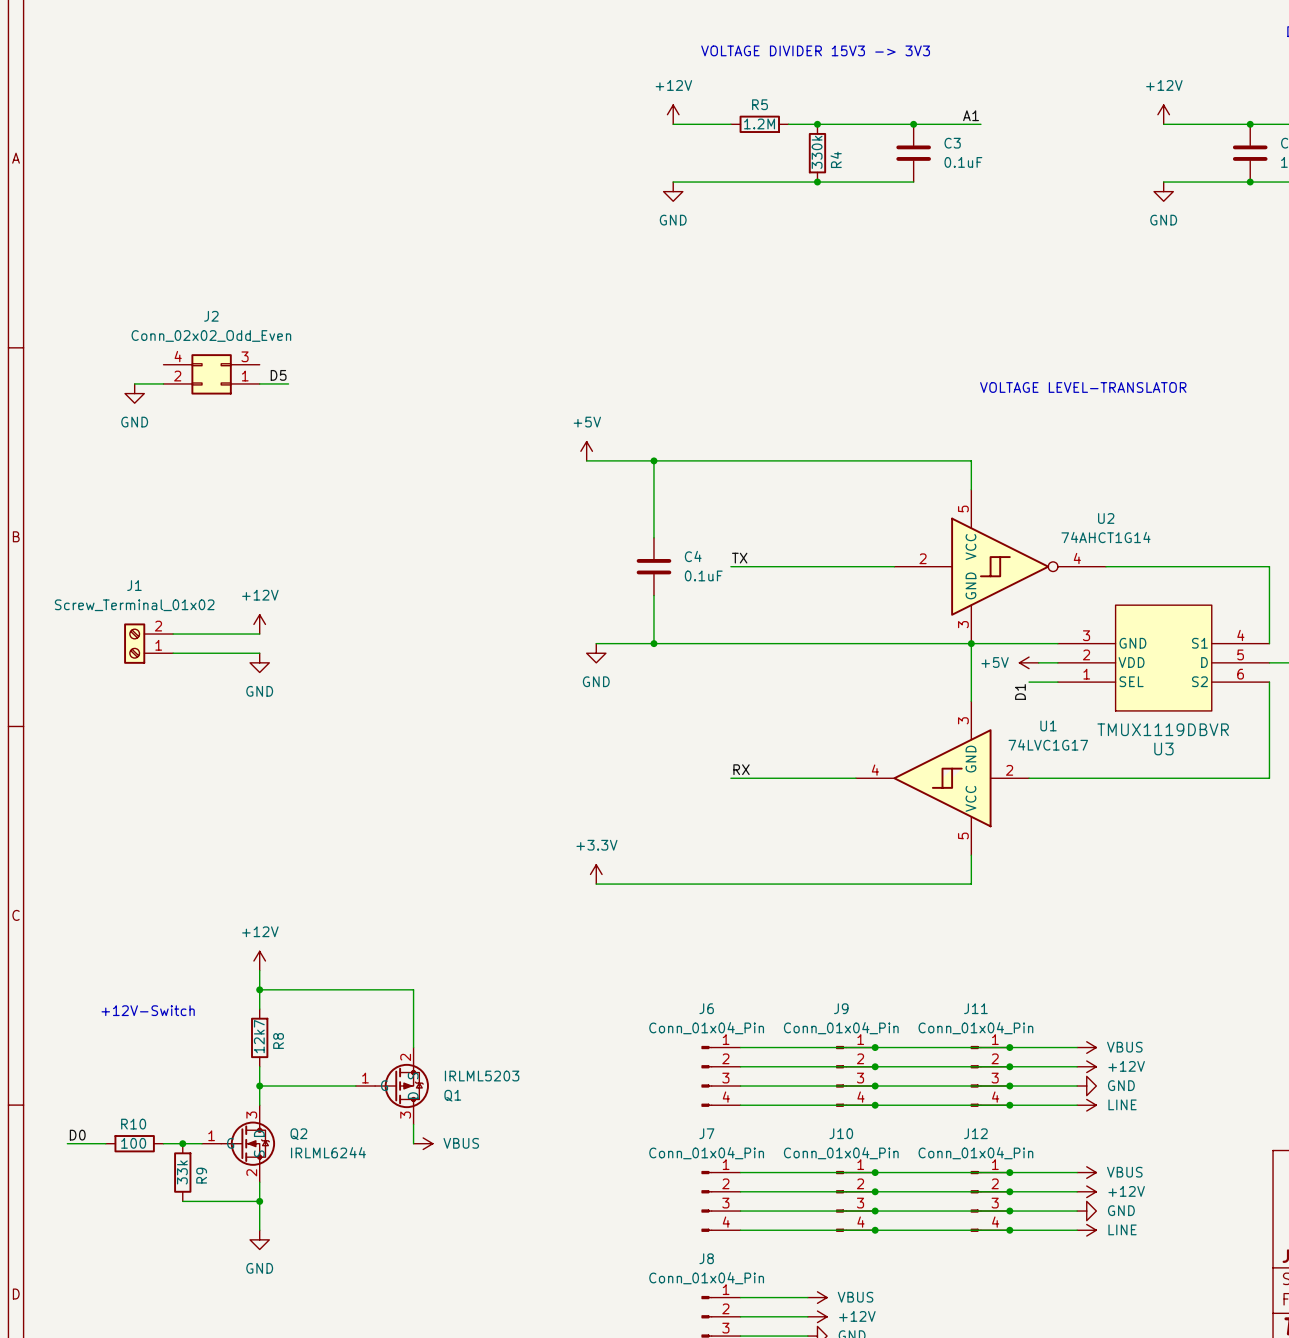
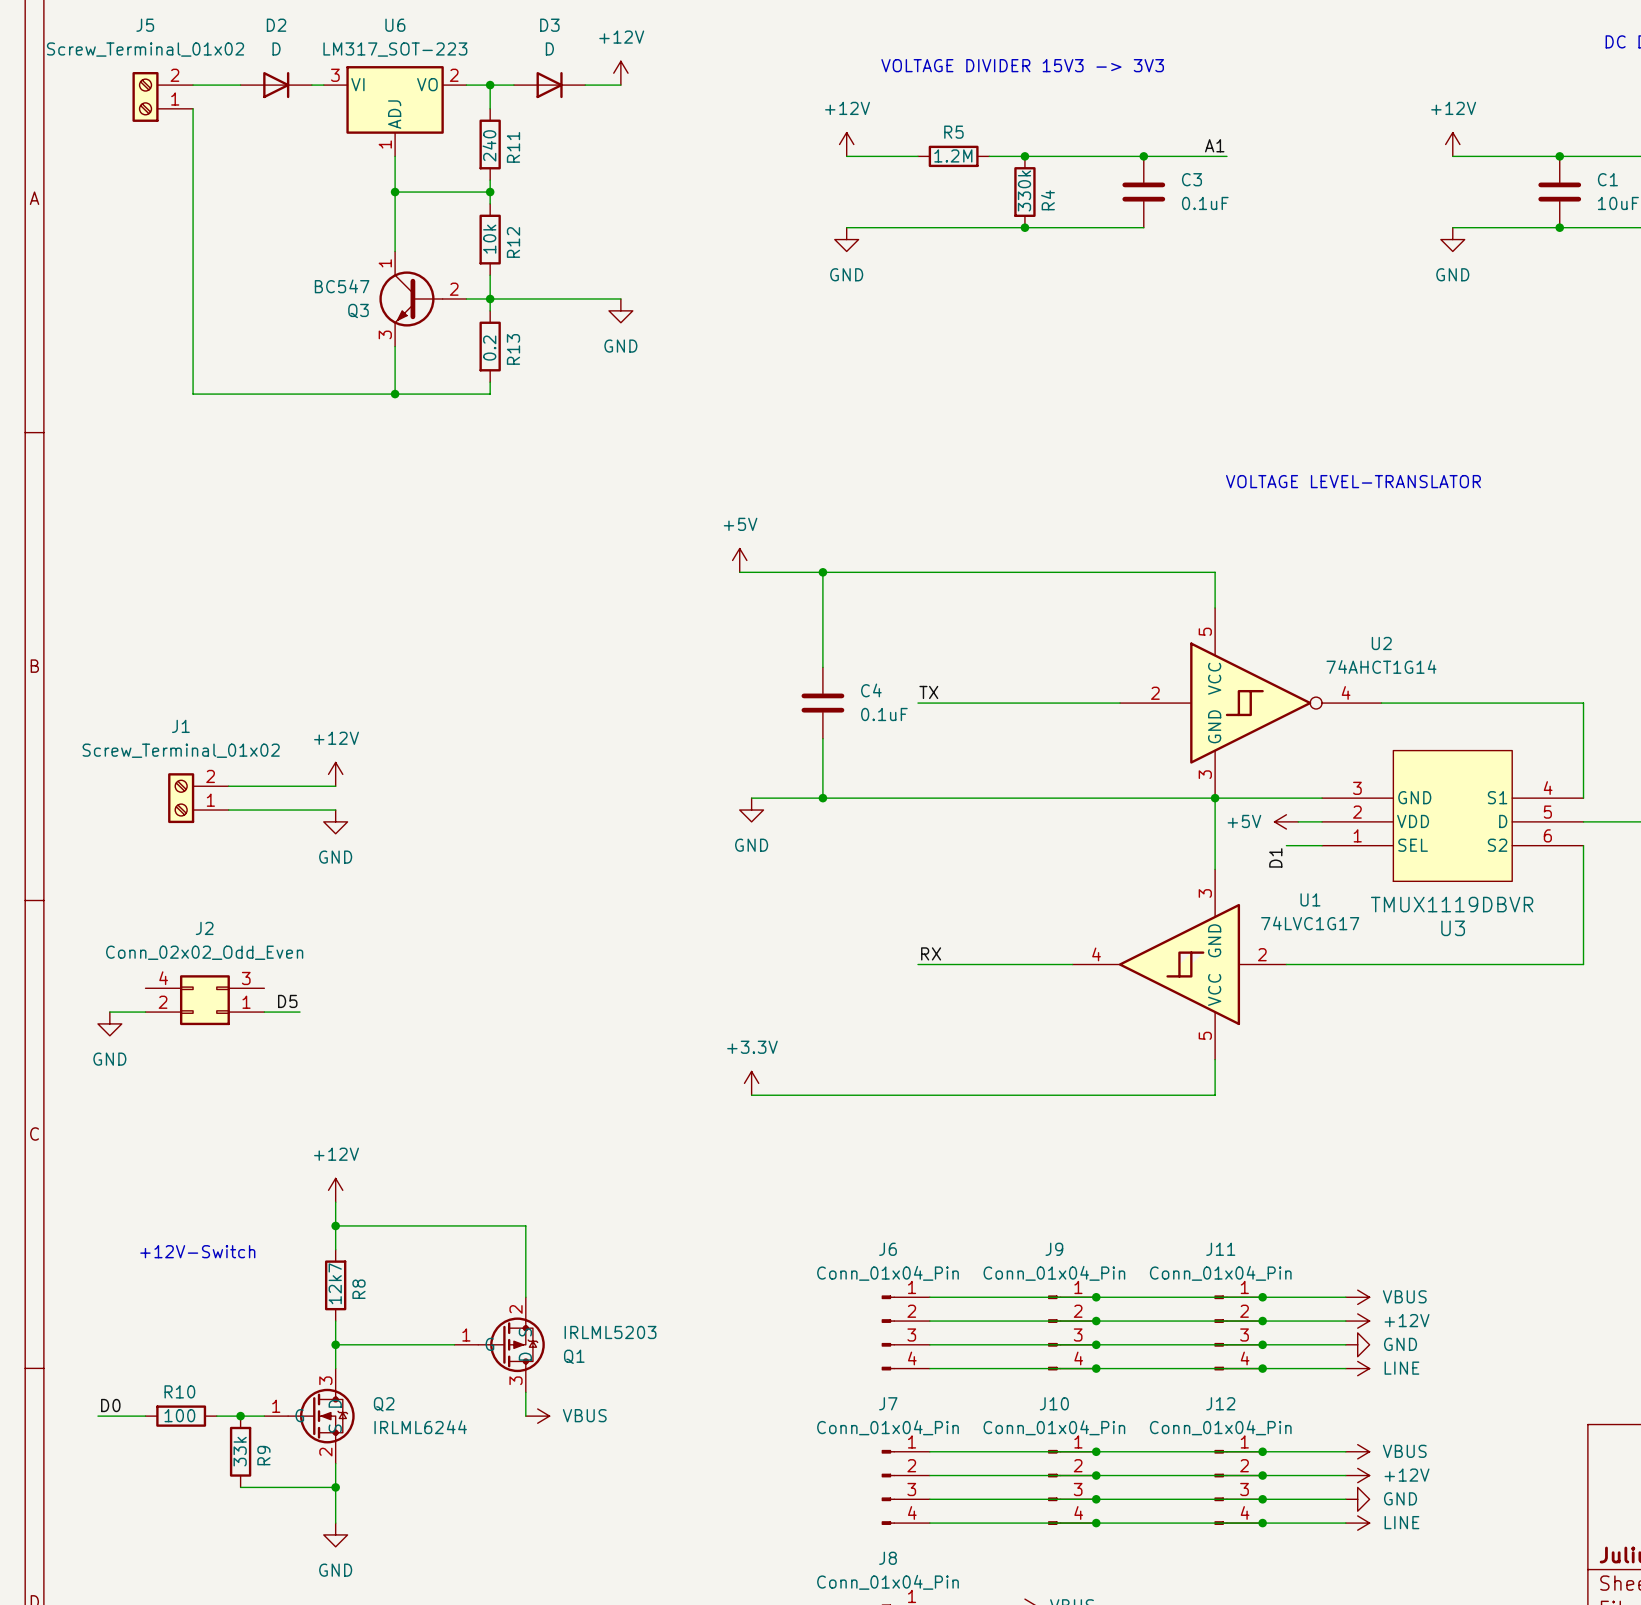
power symbol: none -> +12V (620, 73)
wire: none -> (193, 85) (240, 85)
D2: none -> D (276, 85)
wire: none -> (311, 85) (323, 85)
wire: none -> (466, 85) (513, 85)
wire: none -> (490, 85) (490, 108)
junction: none -> (490, 85)
D3: none -> D (549, 85)
wire: none -> (585, 85) (620, 85)
J5: none -> Screw_Terminal_01x02 (162, 96)
wire: none -> (193, 108) (193, 394) (490, 394) (490, 382)
U6: none -> LM317_SOT-223 (395, 111)
R11: none -> 240 (490, 144)
wire: none -> (395, 156) (395, 251)
wire: none -> (490, 180) (490, 203)
wire: none -> (395, 192) (490, 192)
junction: none -> (395, 192)
junction: none -> (490, 192)
R12: none -> 10k (490, 239)
wire: none -> (490, 275) (490, 310)
Q3: none -> BC547 (422, 298)
wire: none -> (466, 298) (620, 298)
junction: none -> (490, 298)
power symbol: none -> GND (620, 310)
wire: none -> (395, 346) (395, 394)
R13: none -> 0.2 (490, 346)
junction: none -> (395, 394)
J2 position: (211, 374) -> (204, 1000)
label: D5 (278, 375) -> none
wire: (134, 383) (163, 383) -> none
wire: (259, 383) (288, 383) -> none
power symbol: GND (134, 393) -> none
label: none -> D5 (287, 1001)
wire: none -> (109, 1012) (145, 1012)
wire: none -> (264, 1012) (300, 1012)
power symbol: none -> GND (109, 1023)

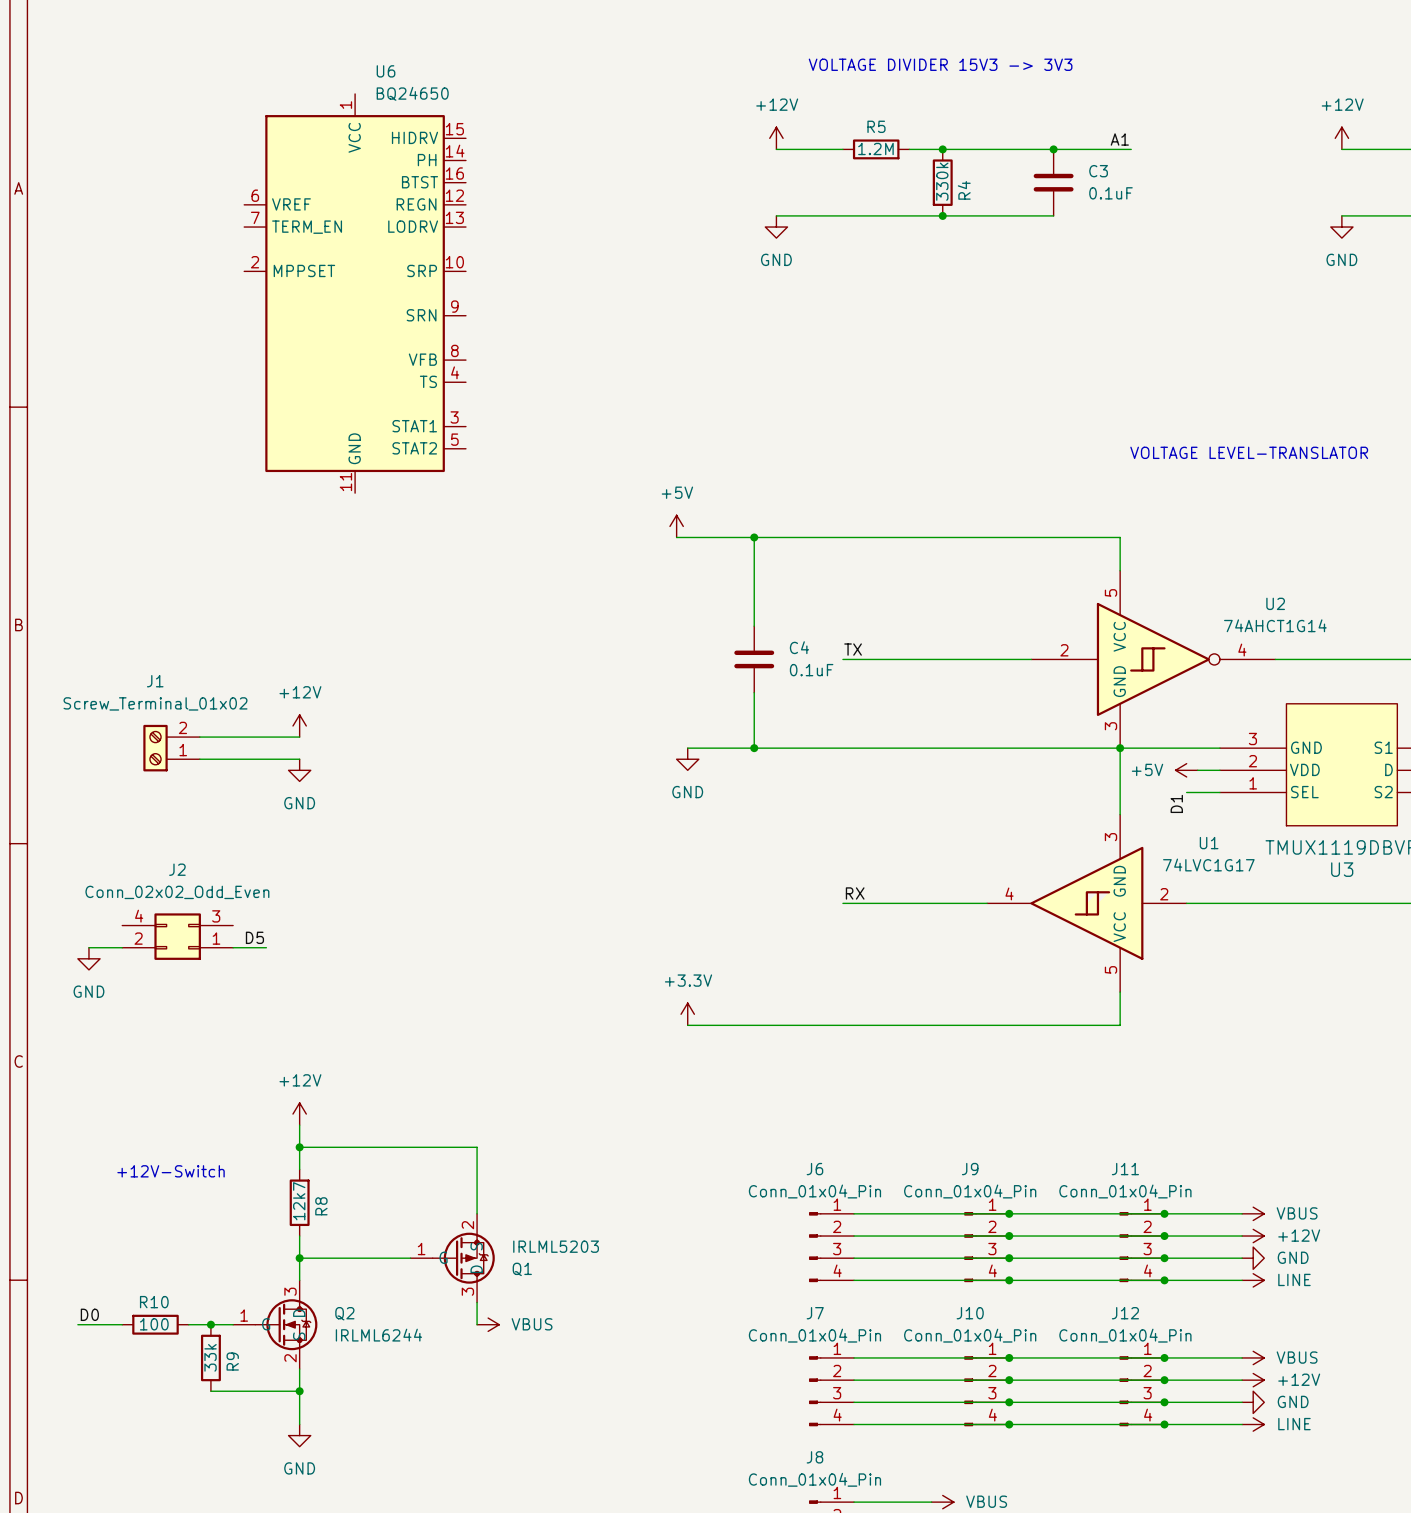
U6 name position: U6 (395, 25) -> U6 (386, 71)
U6 value: LM317_SOT-223 (395, 49) -> BQ24650 (412, 93)
U6 symbol: [323, 66, 467, 157] -> [244, 93, 466, 494]
power symbol: +12V (620, 73) -> none
wire: (193, 85) (240, 85) -> none
D2: D (276, 85) -> none
wire: (311, 85) (323, 85) -> none
wire: (466, 85) (513, 85) -> none
wire: (490, 85) (490, 108) -> none
junction: (490, 85) -> none
D3: D (549, 85) -> none
wire: (585, 85) (620, 85) -> none
J5: Screw_Terminal_01x02 (162, 96) -> none
wire: (193, 108) (193, 394) (490, 394) (490, 382) -> none
R11: 240 (490, 144) -> none
junction: (395, 192) -> none
junction: (490, 192) -> none
R12: 10k (490, 239) -> none
Q3: BC547 (422, 298) -> none
wire: (466, 298) (620, 298) -> none
junction: (490, 298) -> none
power symbol: GND (620, 310) -> none
R13: 0.2 (490, 346) -> none
junction: (395, 394) -> none

